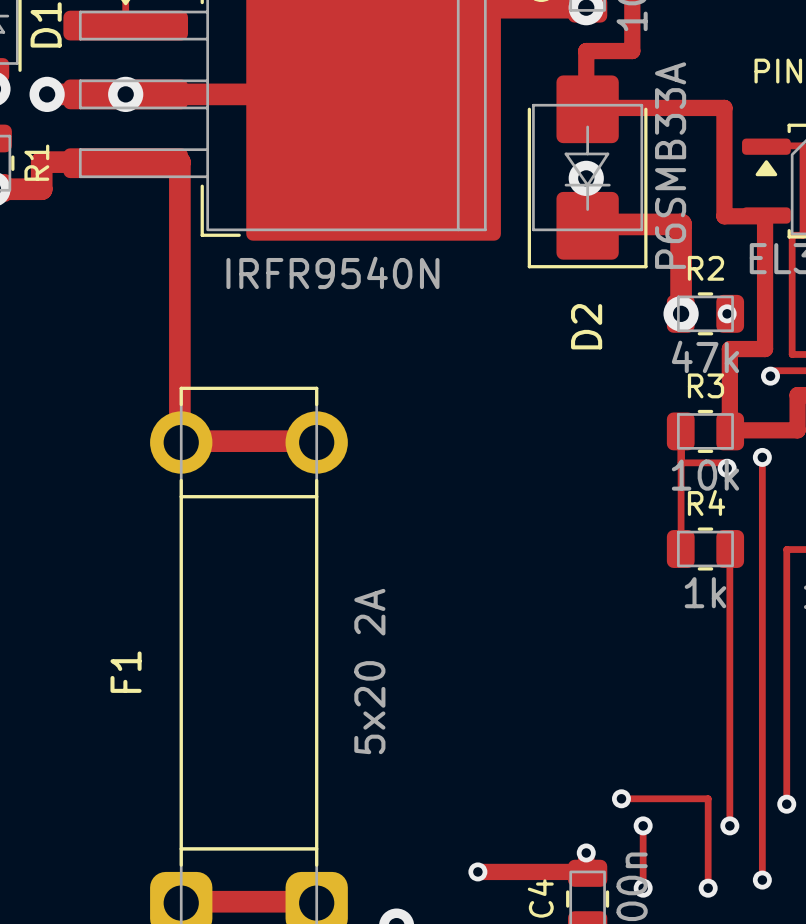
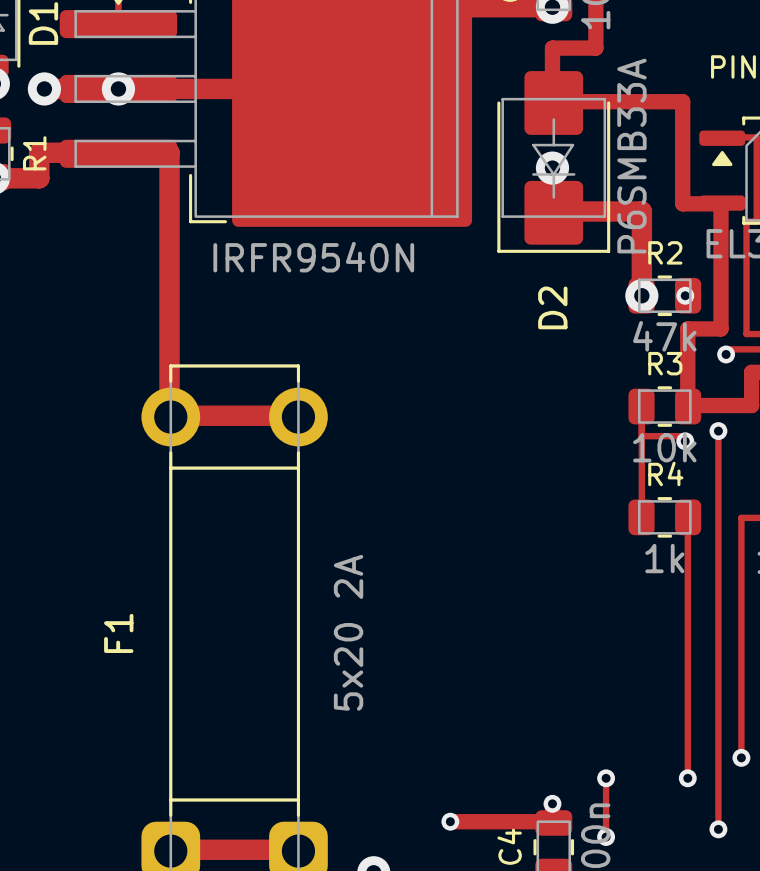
track: (621, 798) (708, 798) (708, 888) -> none
via: (621, 798) -> none
via: (708, 888) -> none

